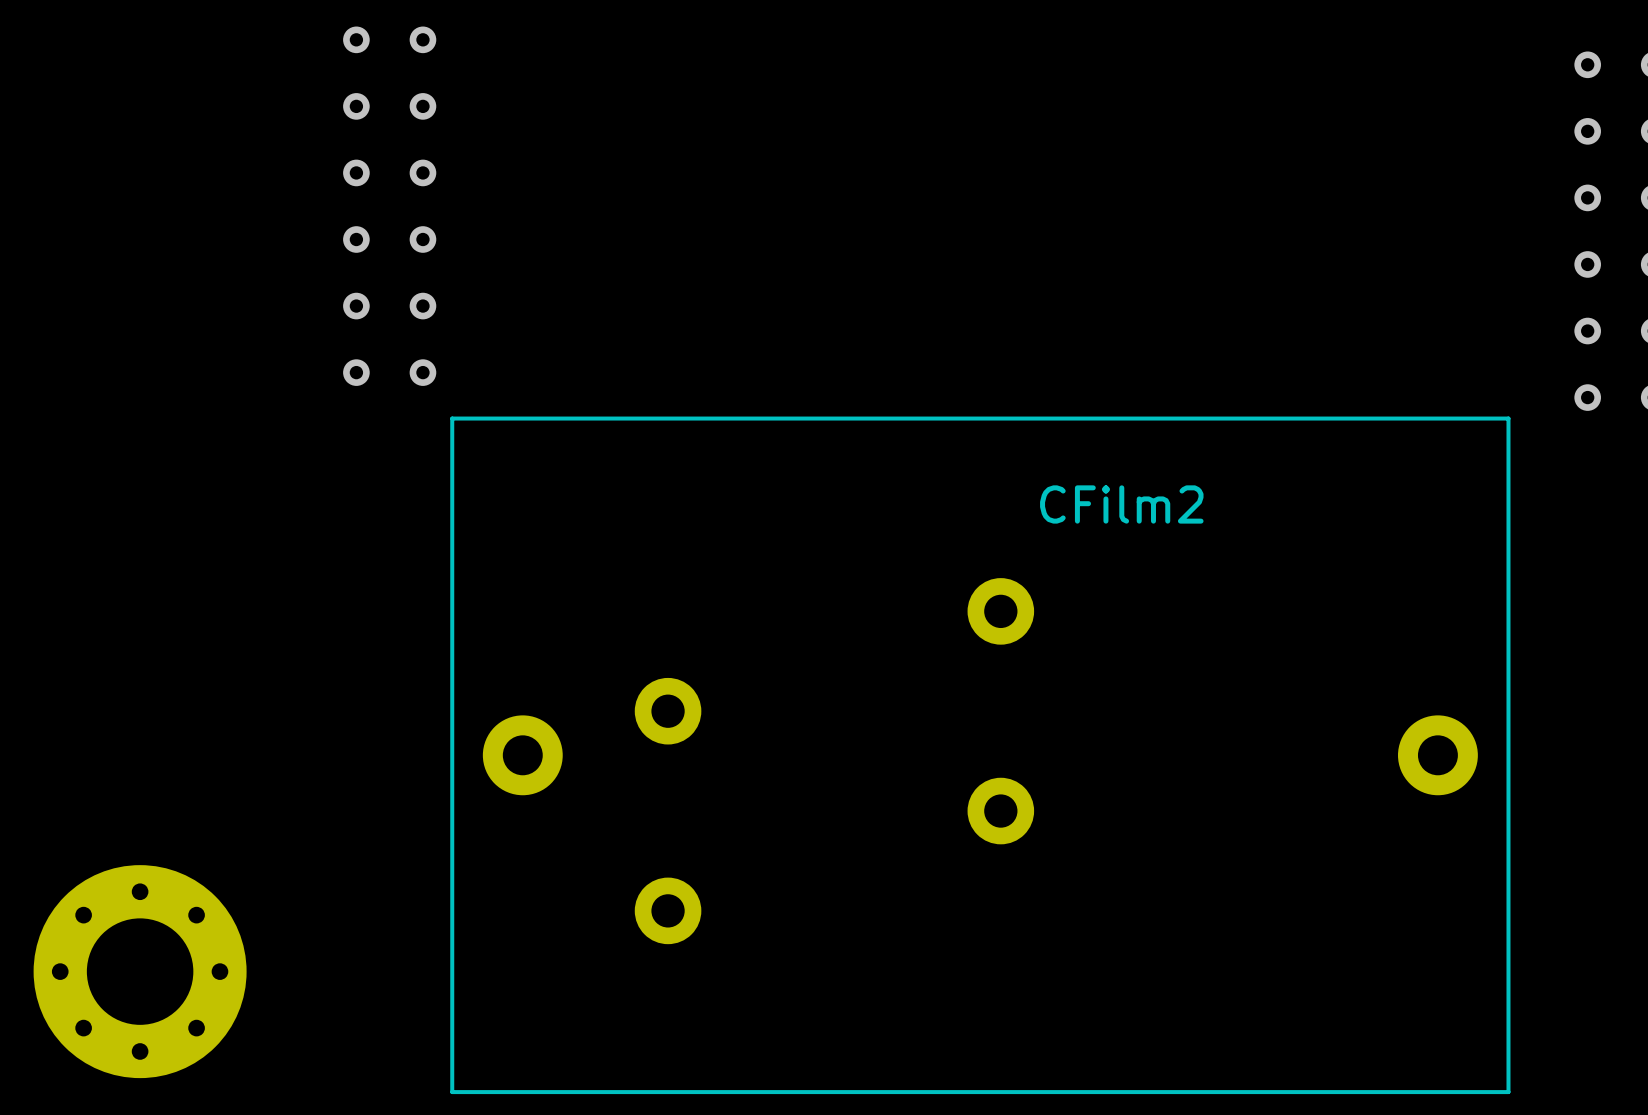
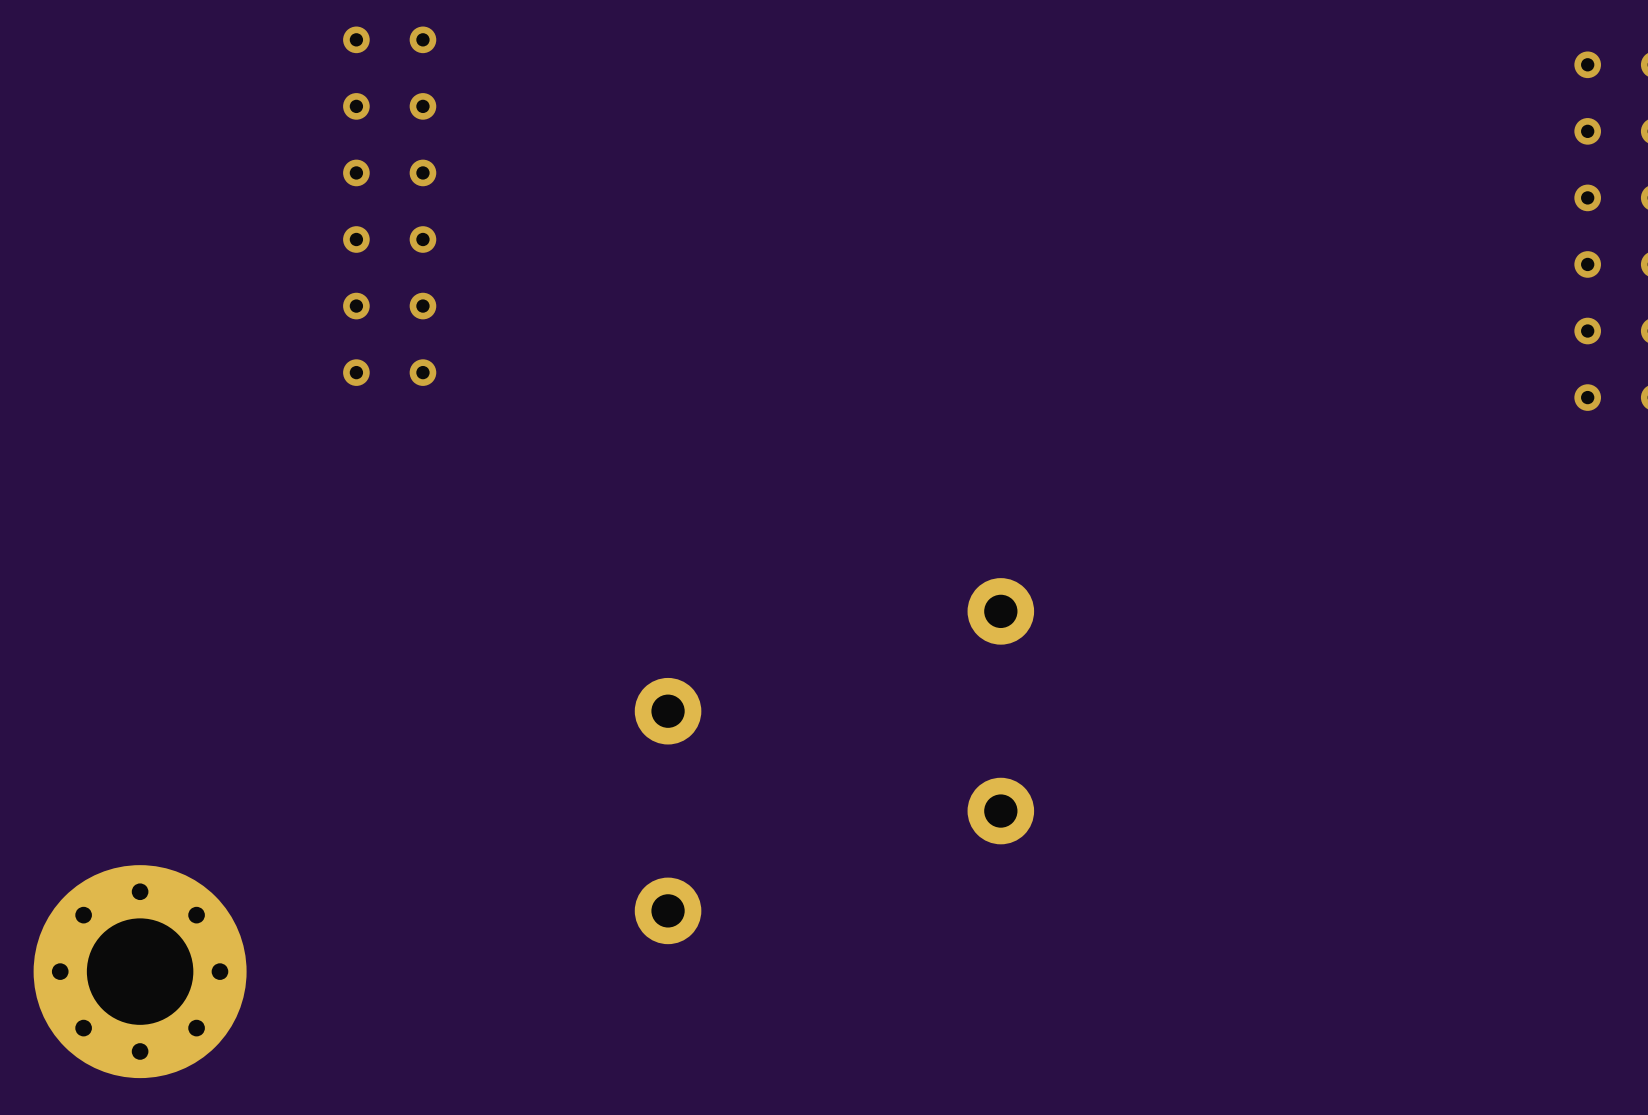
CFilm2: (980, 755) -> none

